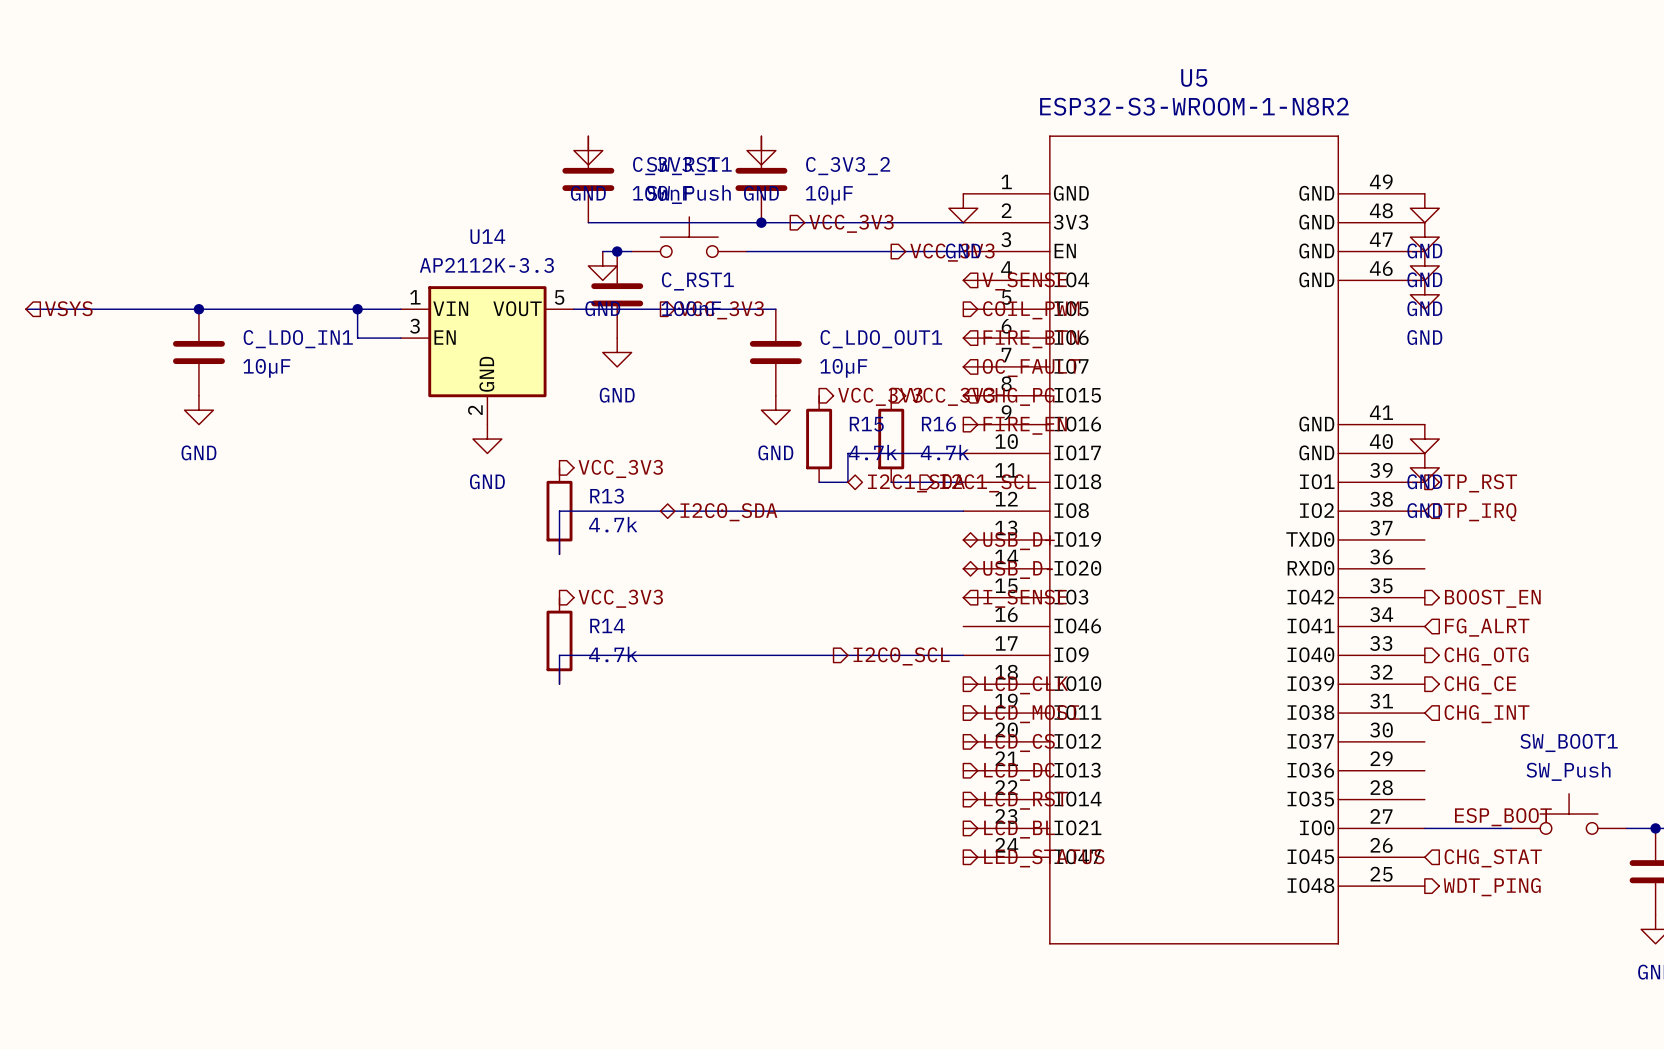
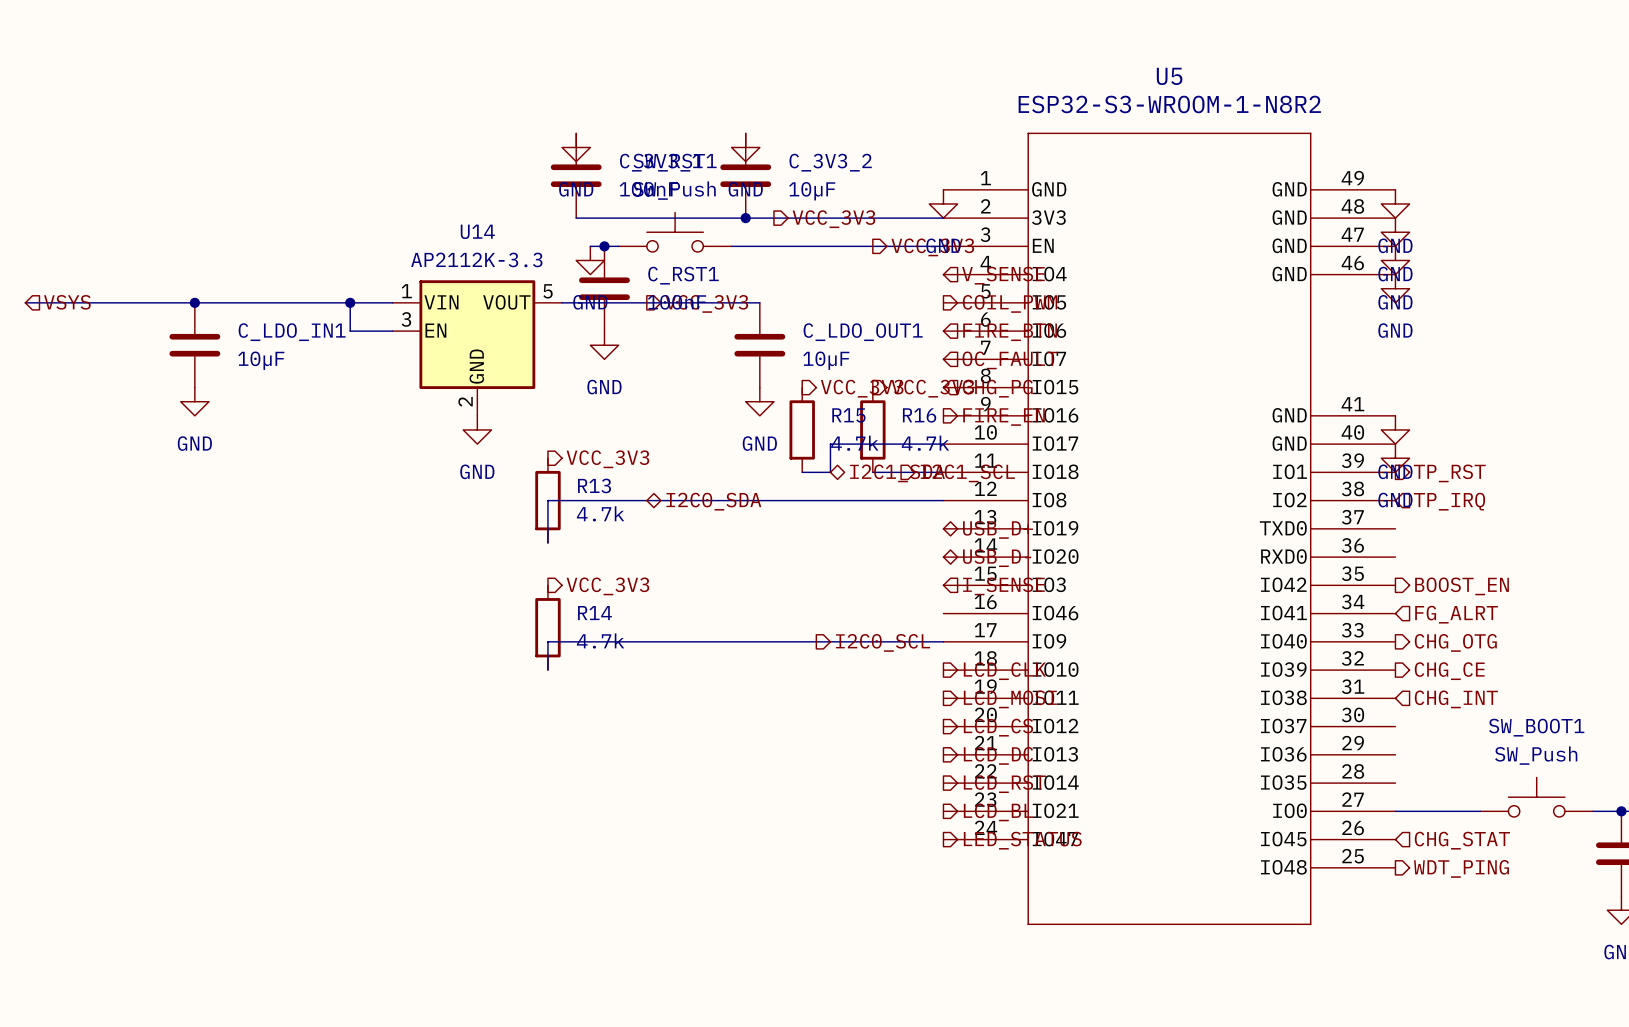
label: ESP_BOOT (1503, 817) -> none

